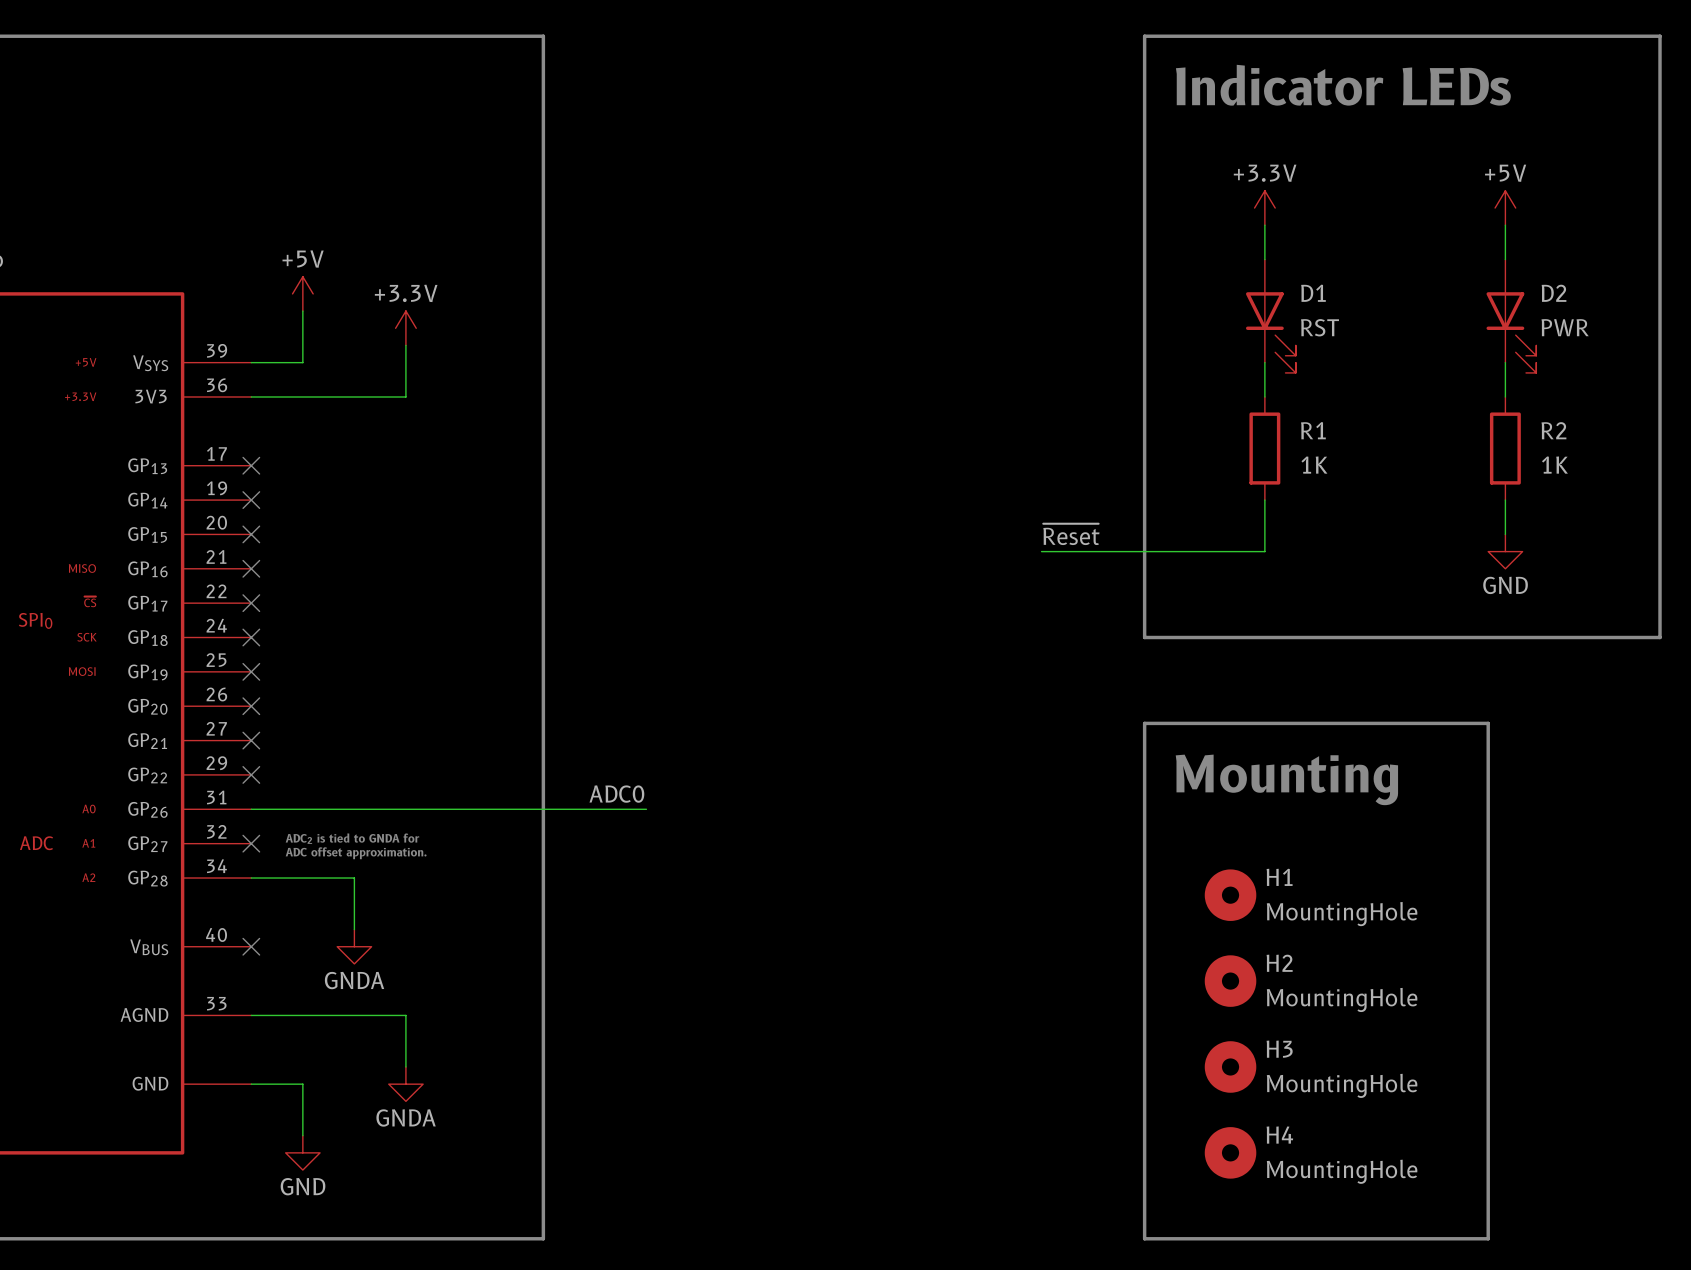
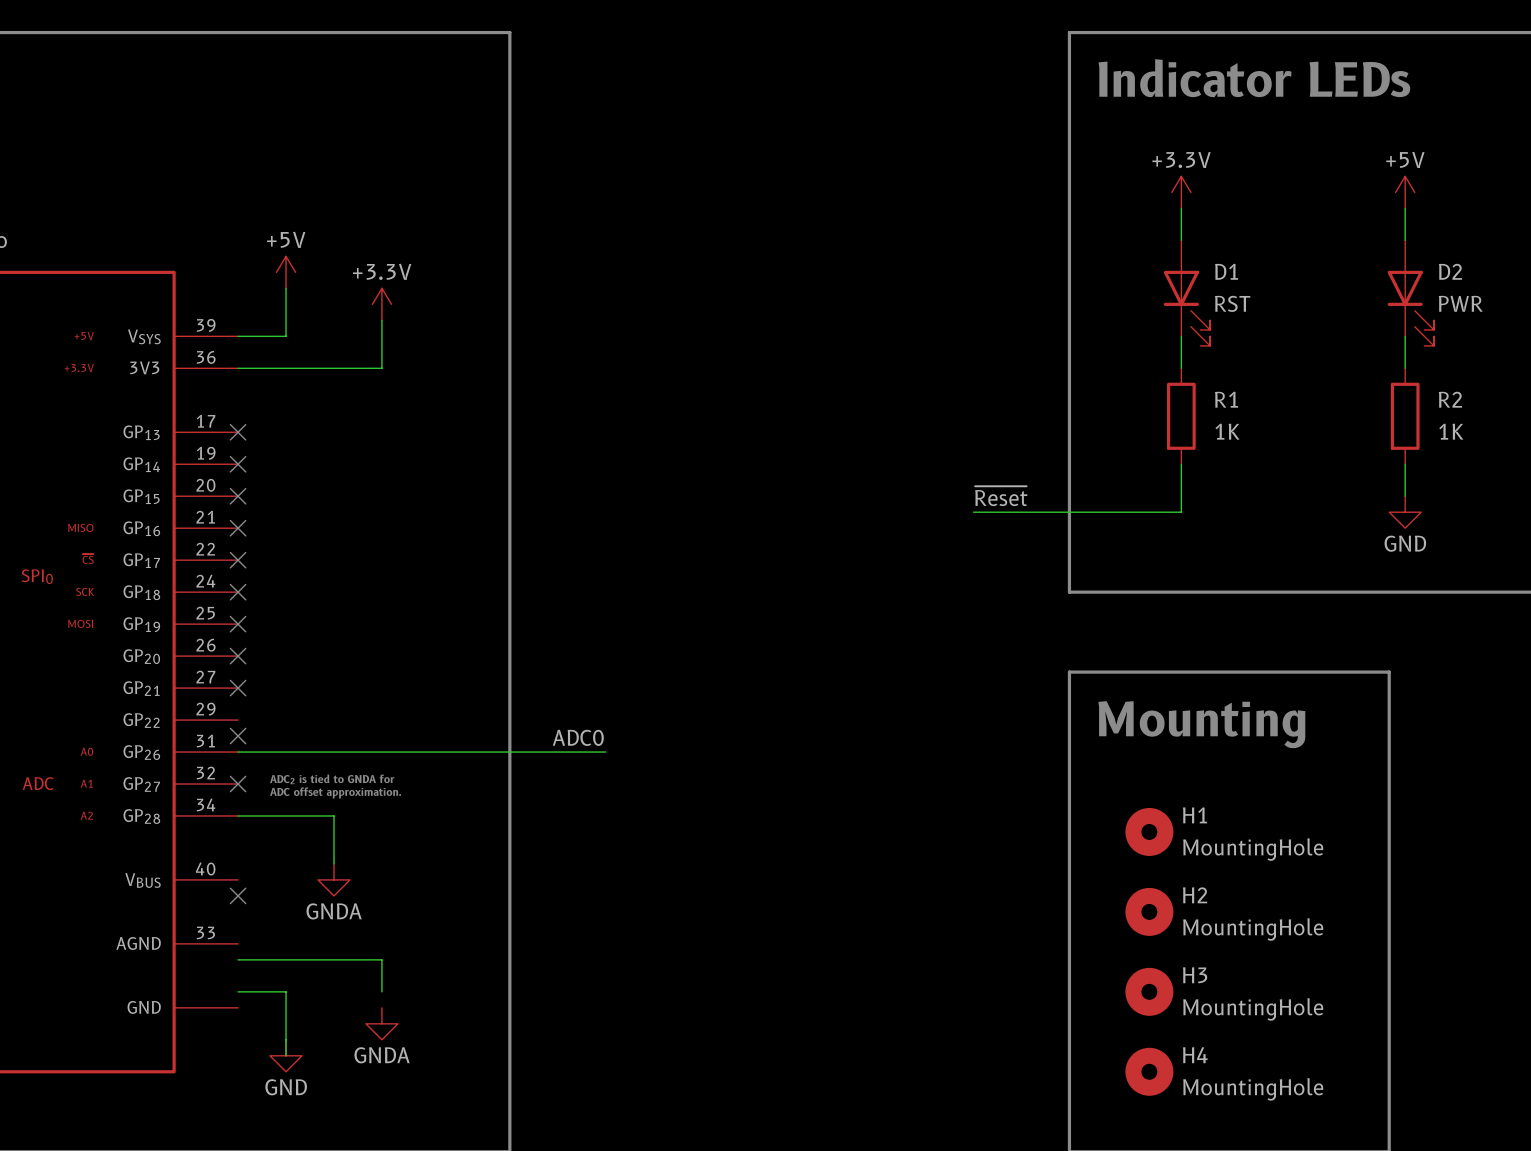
no-connect mark position: (251, 774) -> (238, 736)
no-connect mark position: (251, 946) -> (238, 895)
wire: (251, 1015) (405, 1015) (405, 1032) -> (238, 959) (381, 959)
wire: (251, 1084) (302, 1084) -> (238, 991) (286, 991) (286, 1007)
power symbol position: GNDA (405, 1084) -> GNDA (381, 1023)
power symbol position: GND (302, 1152) -> GND (286, 1055)

